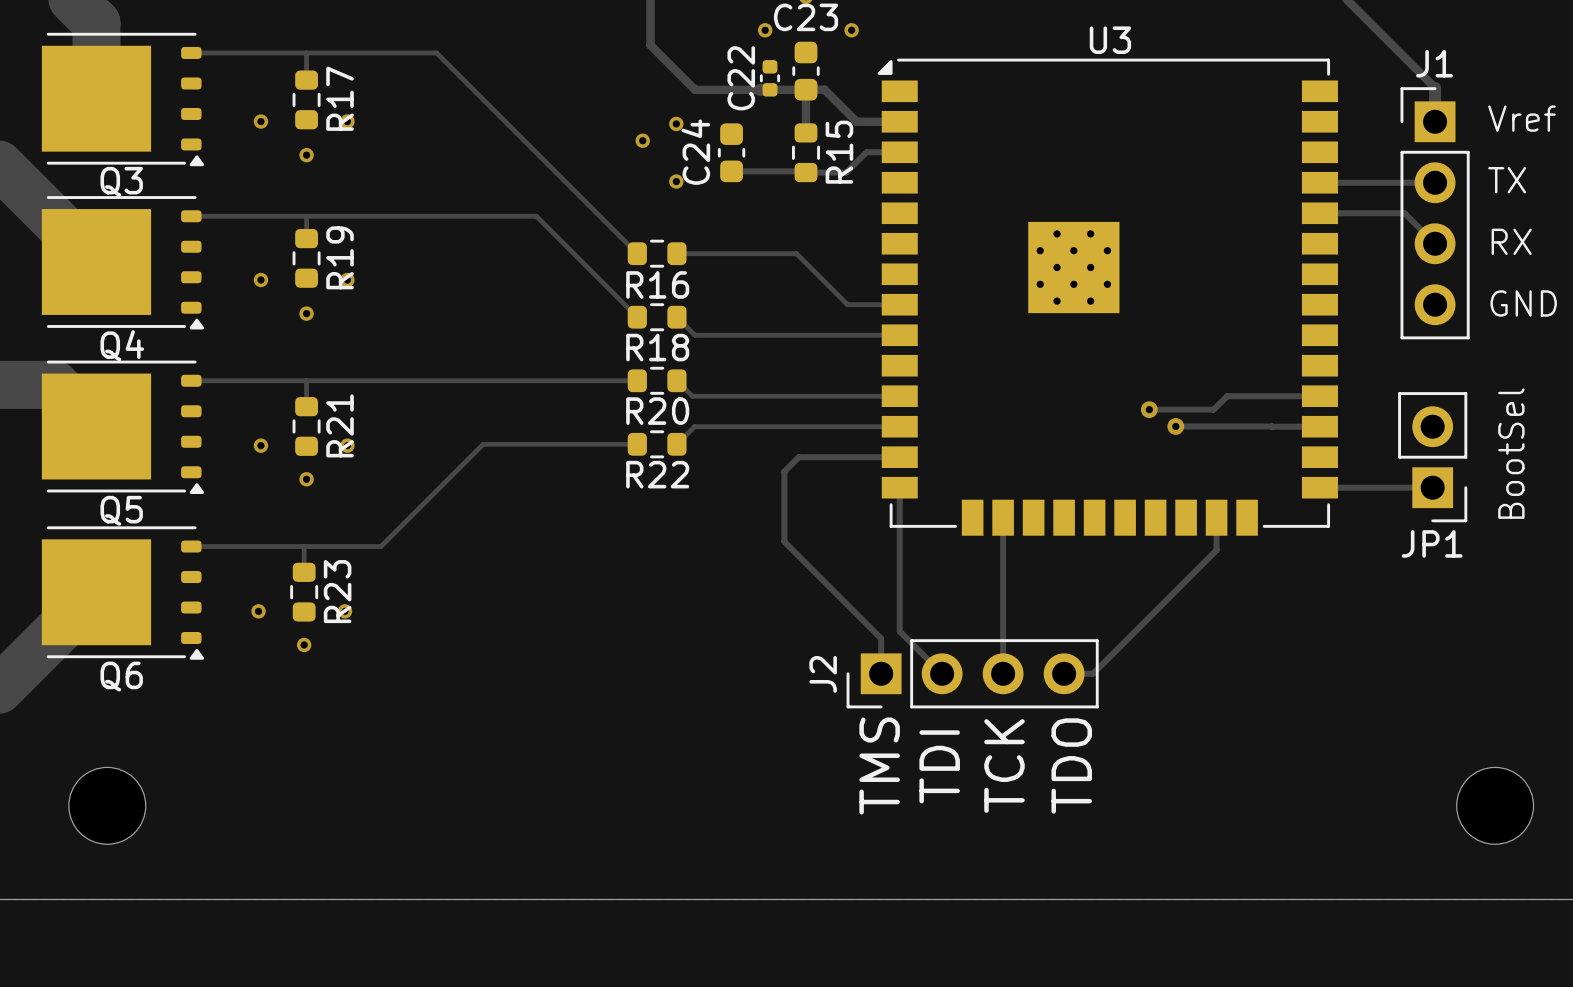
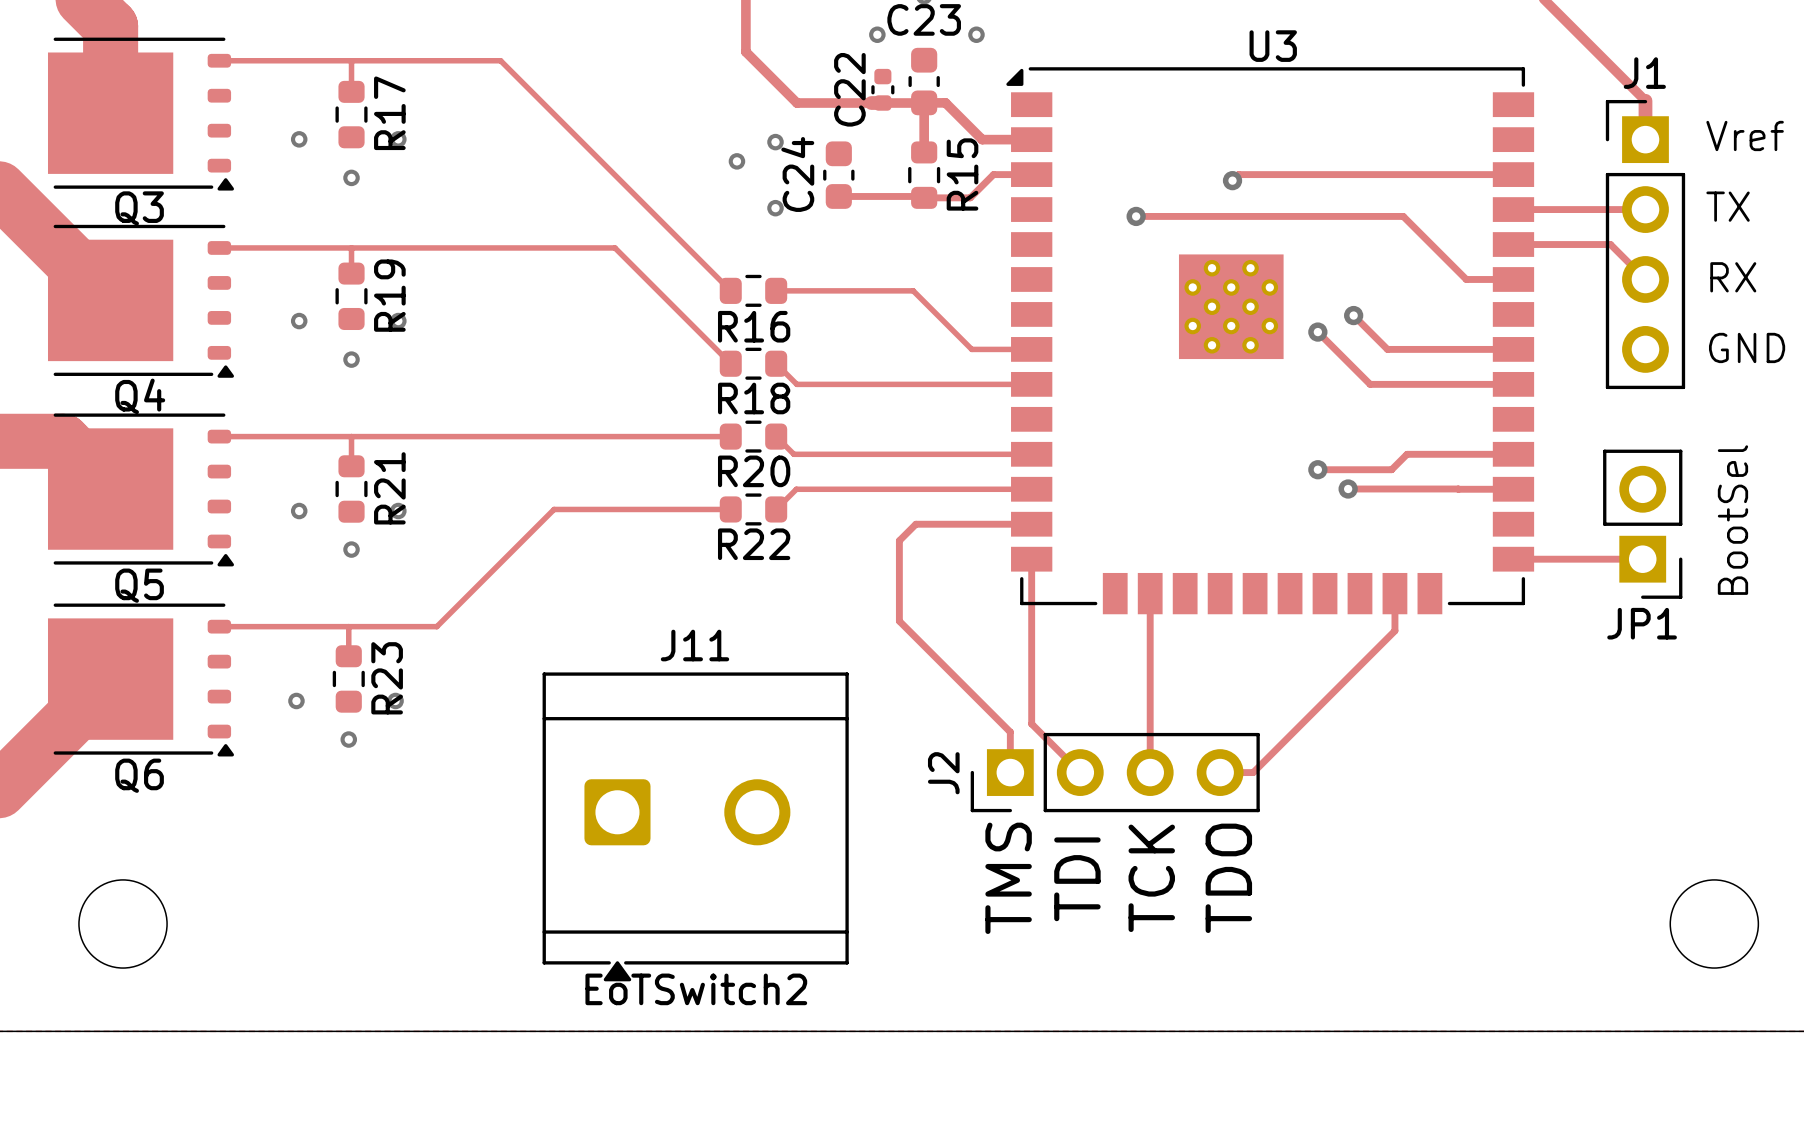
track: none -> (1513, 174) (1238, 174) (1232, 180)
via: none -> (1232, 180)
track: none -> (1136, 216) (1403, 216) (1466, 279) (1513, 279)
via: none -> (1136, 216)
track: none -> (1353, 315) (1387, 349) (1513, 349)
via: none -> (1353, 315)
track: none -> (1317, 332) (1370, 384) (1513, 384)
via: none -> (1317, 332)
J11: none -> EoTSwitch2 (695, 826)

